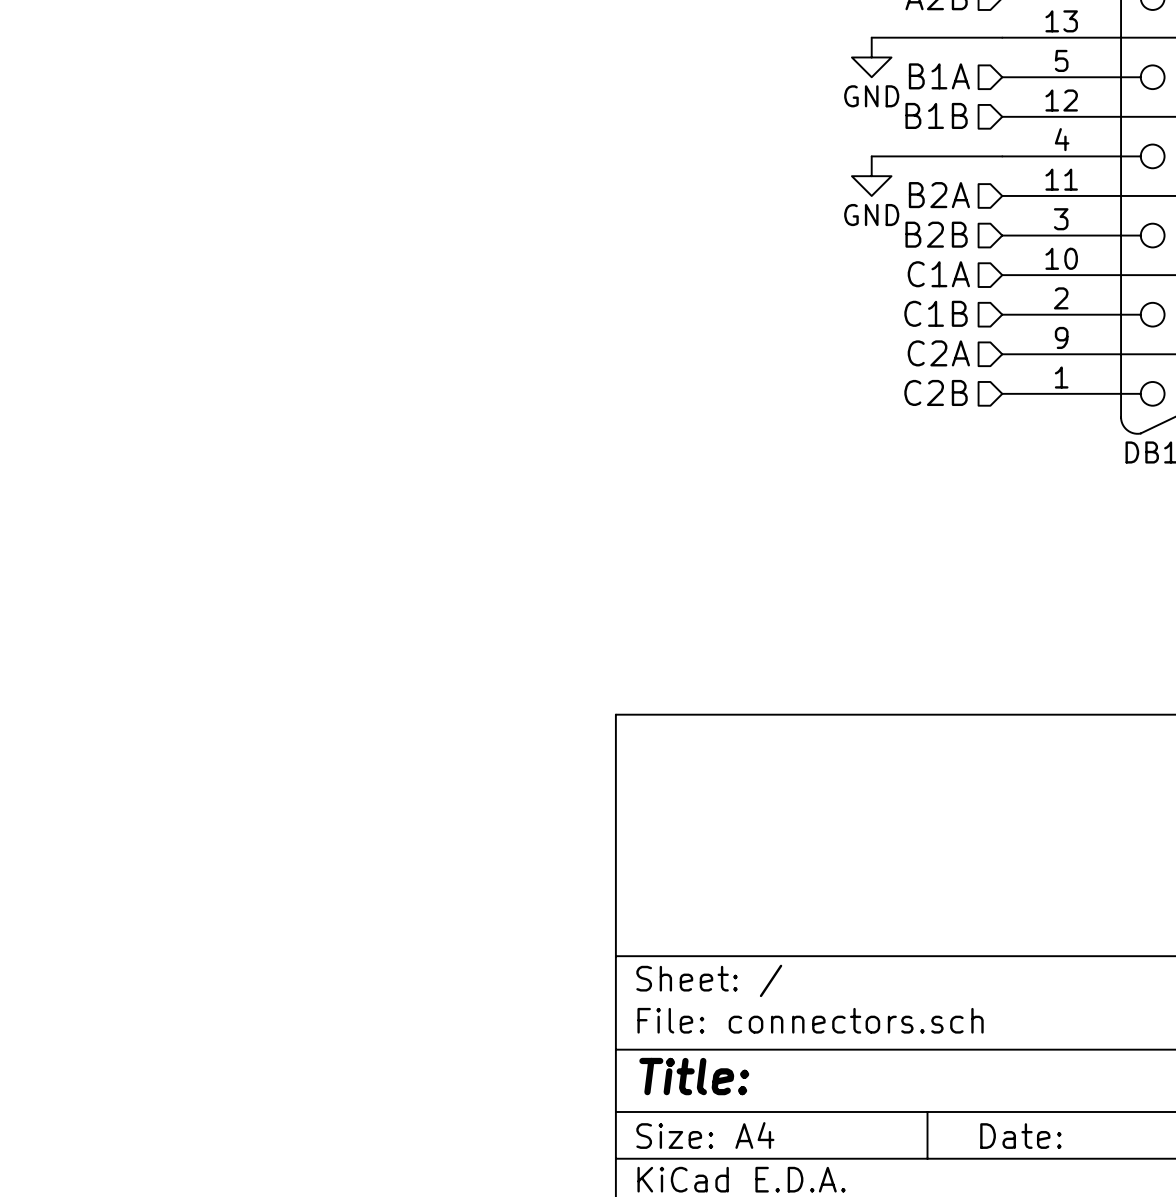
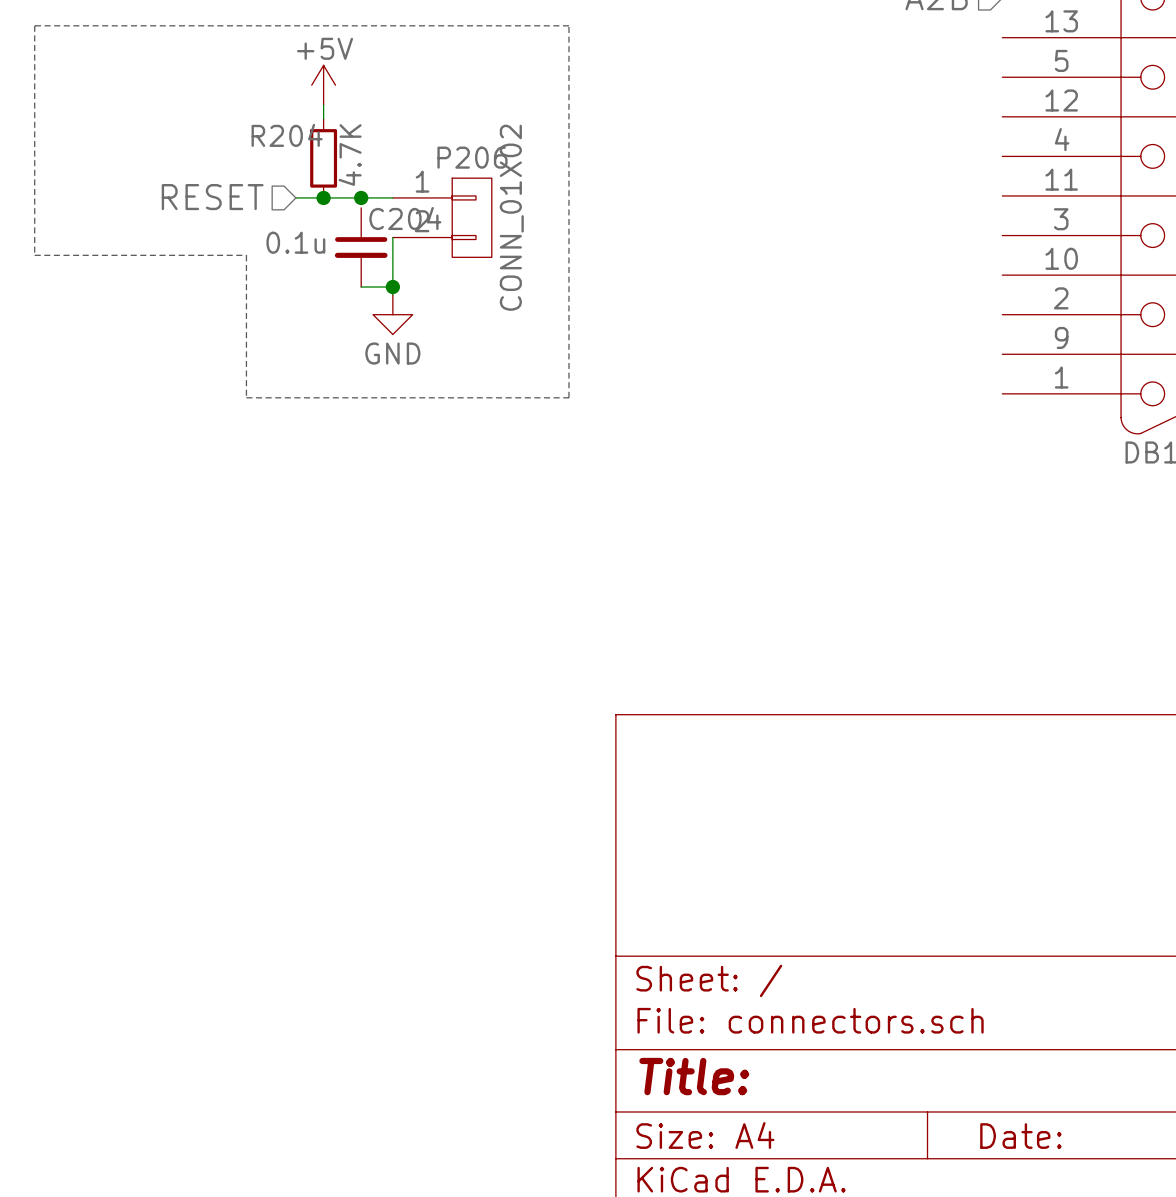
line: none -> (34, 25) (34, 255) (246, 255) (246, 397) (568, 397) (568, 25) (34, 25)
wire: (871, 37) (1002, 37) -> none
power symbol: GND (871, 57) -> none
hierarchical label: B1A (939, 76) -> none
power symbol: none -> +5V (323, 85)
wire: none -> (323, 104) (323, 118)
hierarchical label: B1B (936, 115) -> none
wire: (871, 156) (1002, 156) -> none
R204: none -> 4.7K (323, 158)
power symbol: GND (871, 176) -> none
hierarchical label: B2A (939, 195) -> none
hierarchical label: none -> RESET (212, 197)
wire: none -> (295, 197) (392, 197)
junction: none -> (323, 197)
junction: none -> (361, 197)
P206: none -> CONN_01X02 (442, 217)
hierarchical label: B2B (936, 234) -> none
wire: none -> (392, 237) (392, 294)
C204: none -> 0.1u (361, 247)
hierarchical label: C1A (938, 274) -> none
wire: none -> (361, 287) (392, 287)
junction: none -> (392, 287)
hierarchical label: C1B (936, 313) -> none
power symbol: none -> GND (392, 314)
hierarchical label: C2A (938, 353) -> none
hierarchical label: C2B (936, 392) -> none

